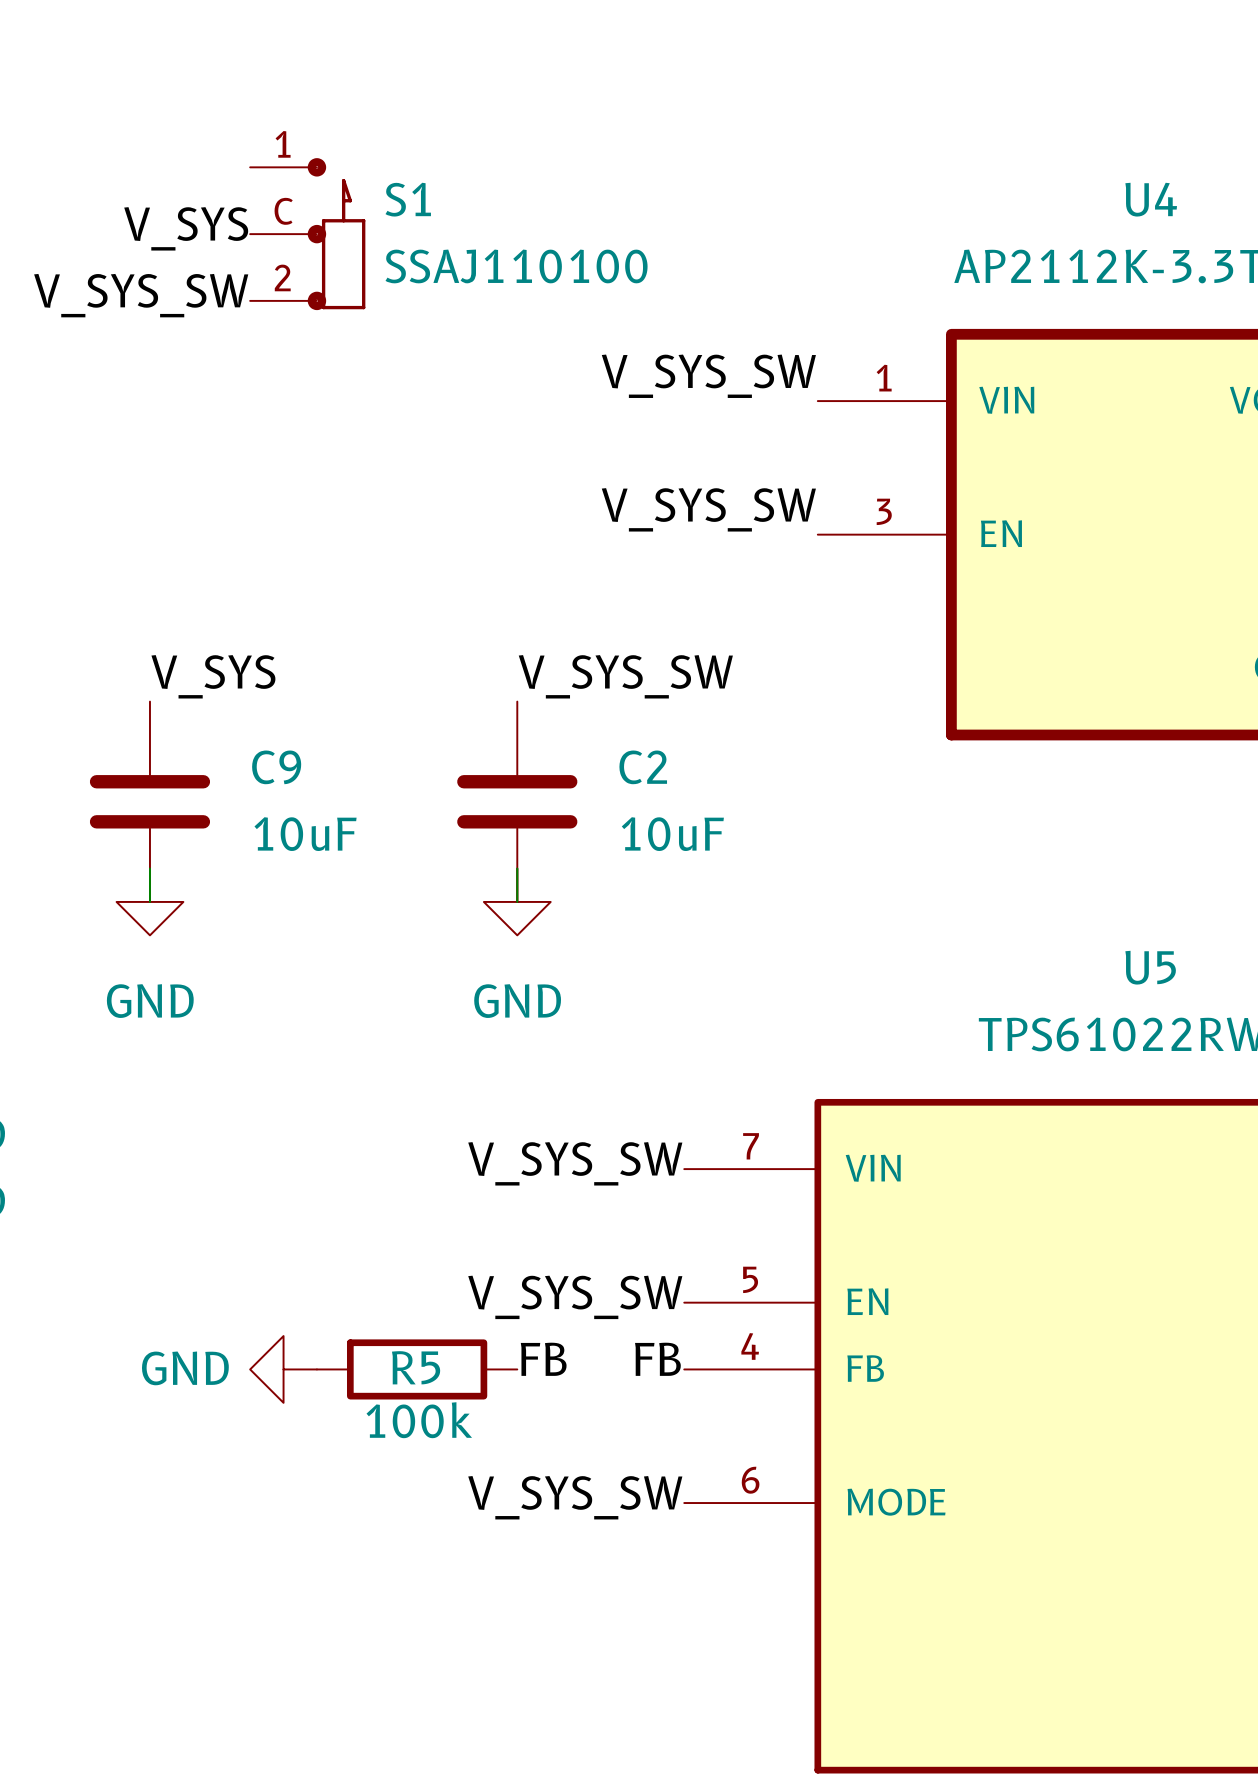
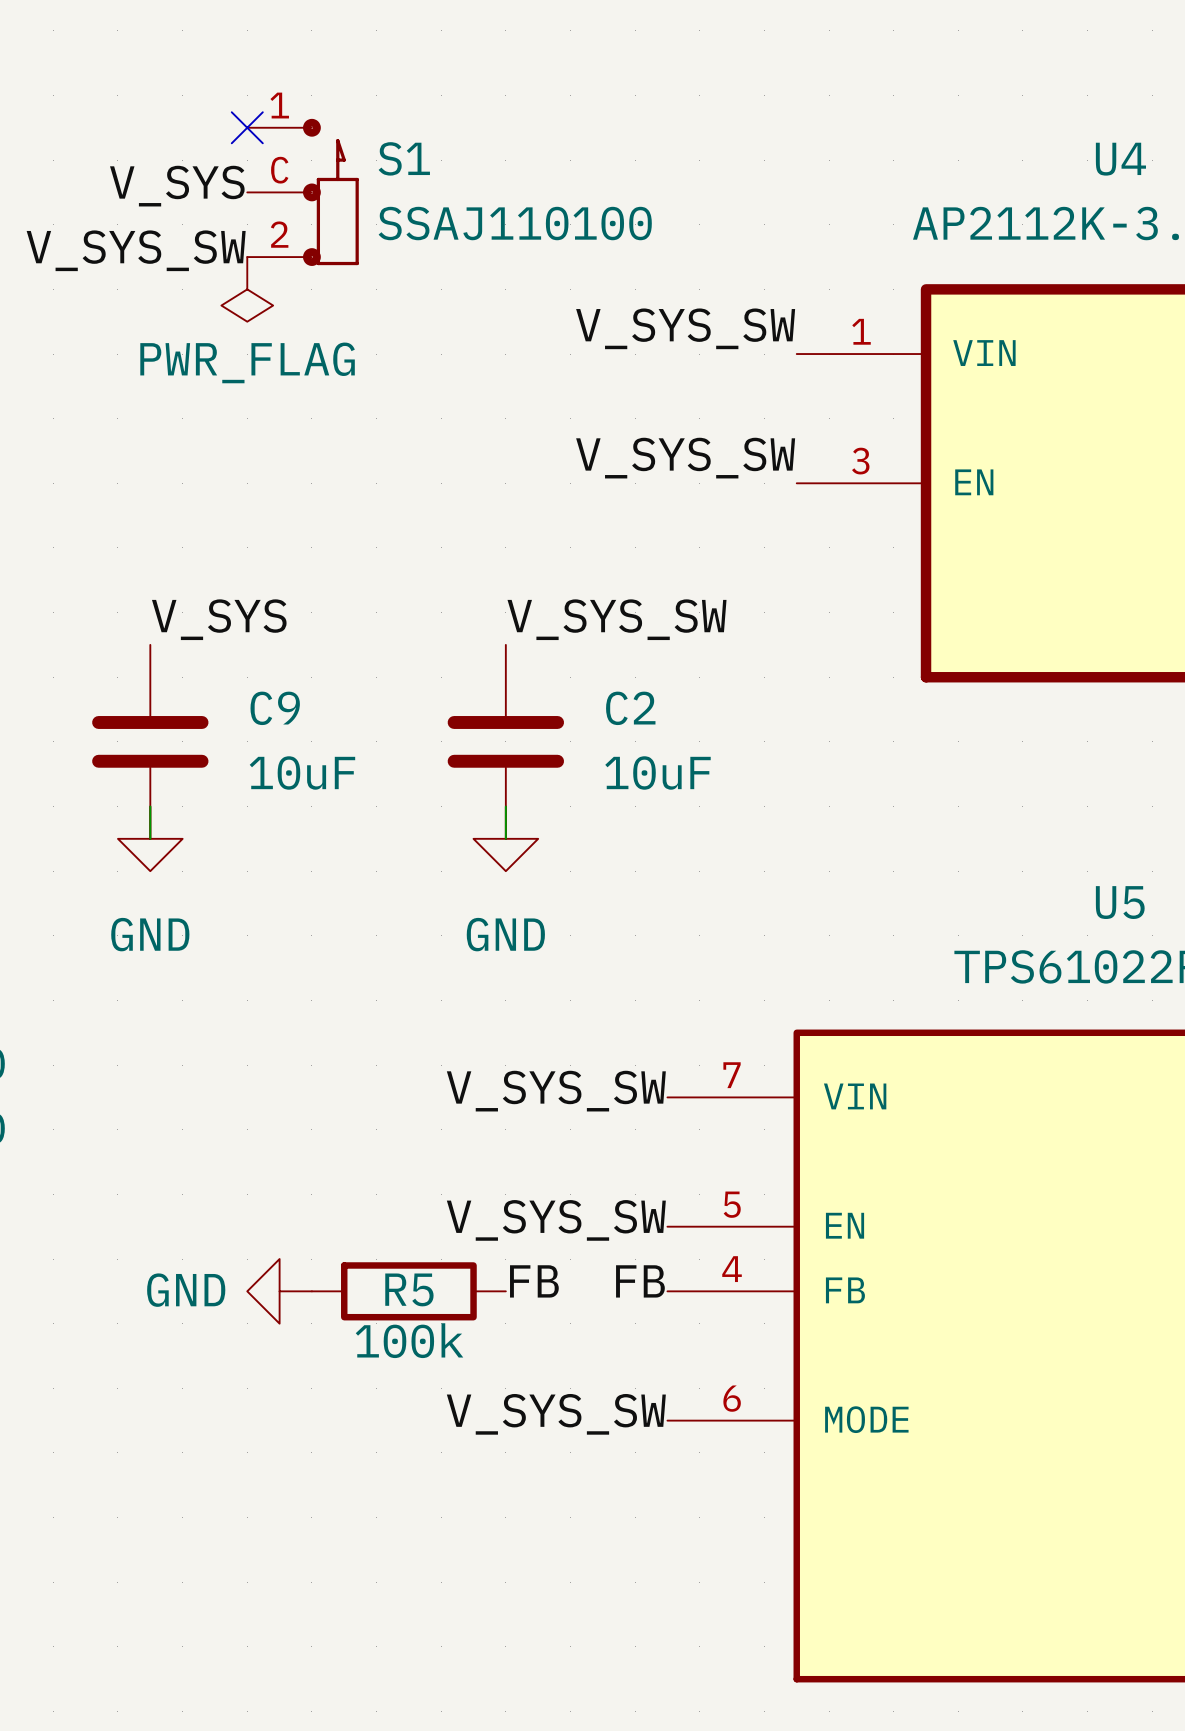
no-connect mark: none -> (247, 127)
power symbol: none -> PWR_FLAG (247, 289)

